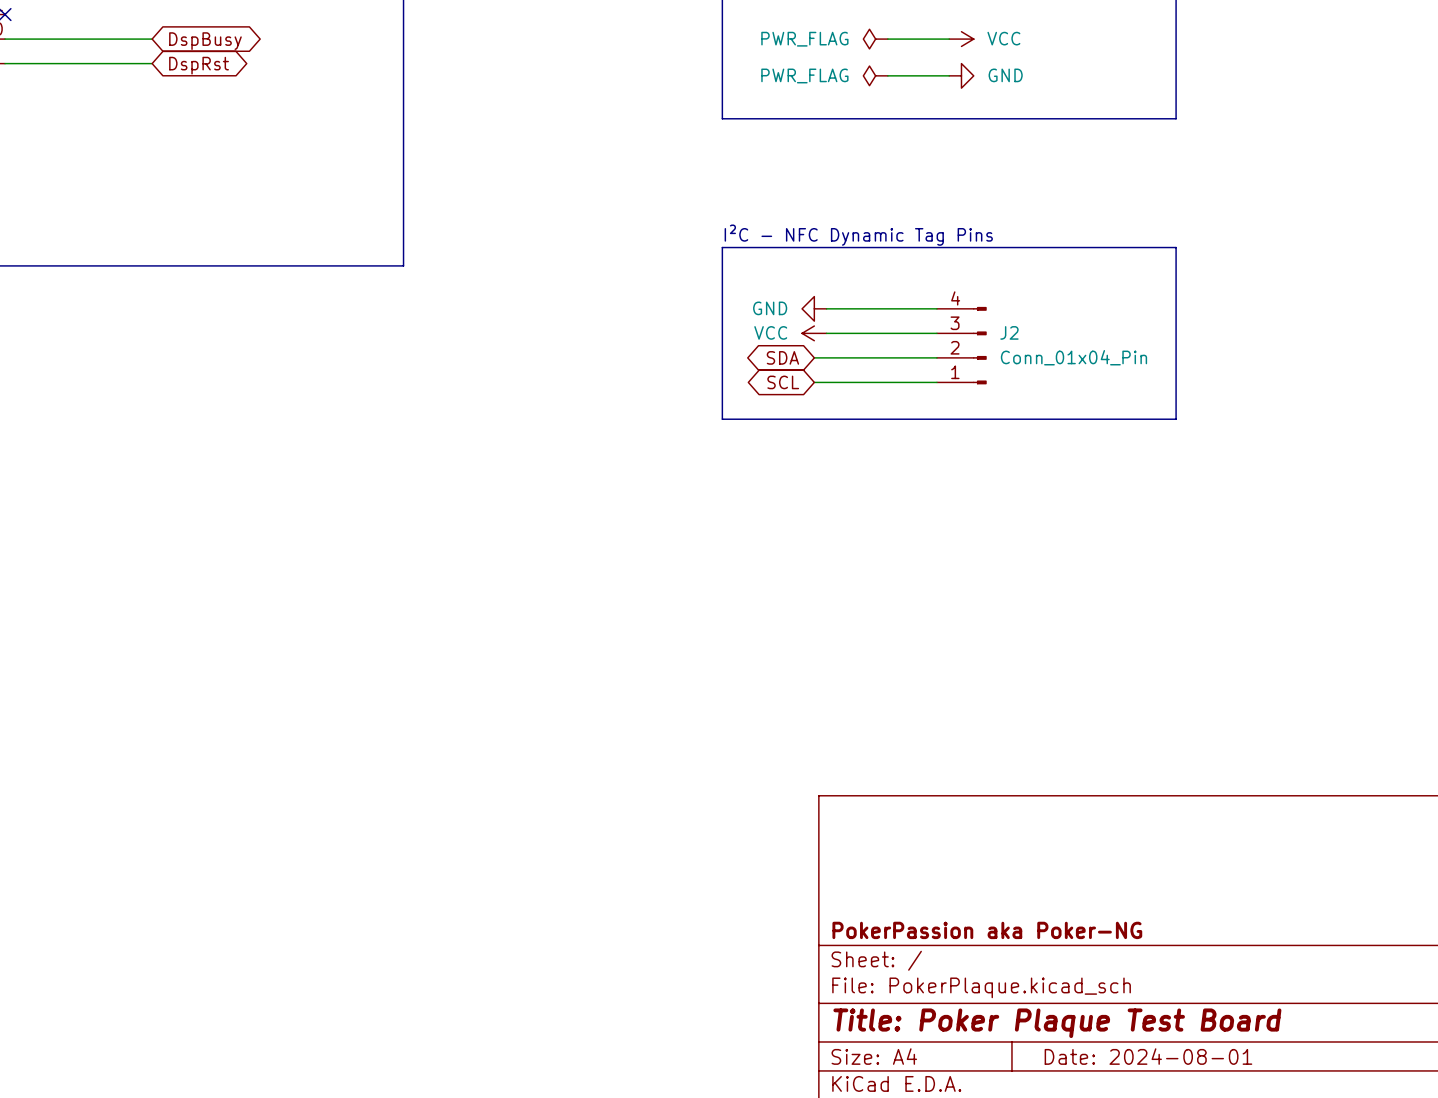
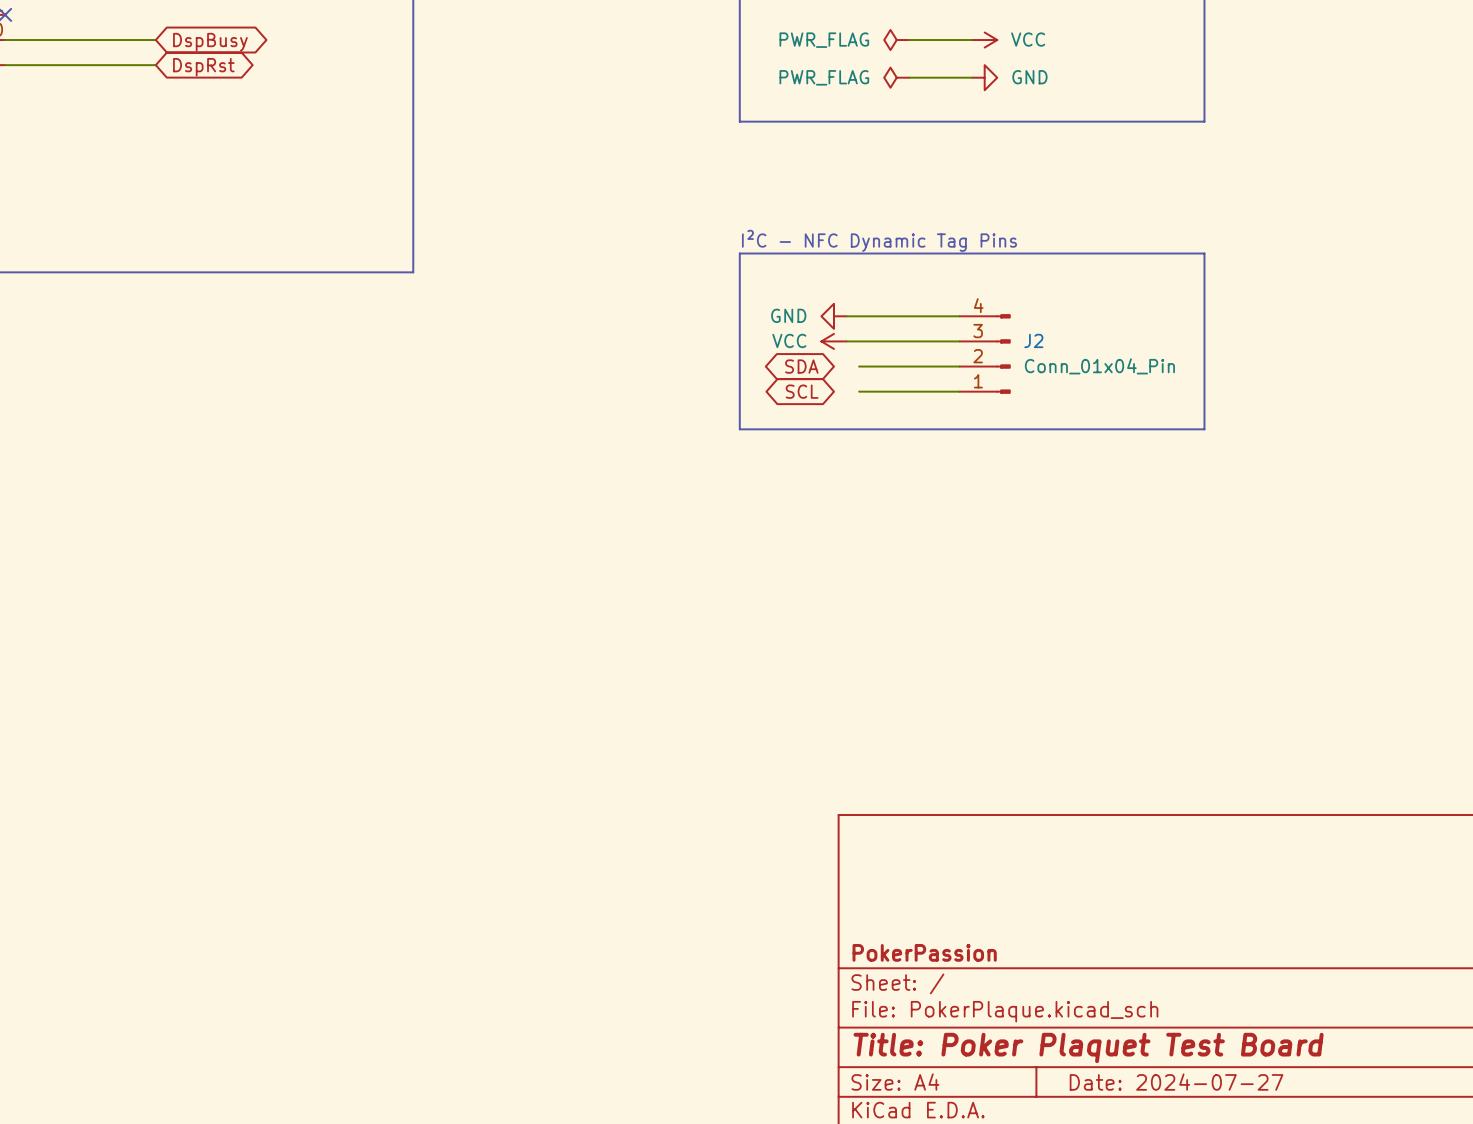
wire: (814, 357) (838, 357) -> none
wire: (814, 382) (838, 382) -> none
title block: PokerPassion aka Poker-NG (987, 930) -> PokerPassion (924, 952)
title block: Title: Poker Plaque Test Board (1057, 1023) -> Title: Poker Plaquet Test Board (1088, 1047)
title block: Date: 2024-08-01 (1148, 1056) -> Date: 2024-07-27 (1176, 1082)

